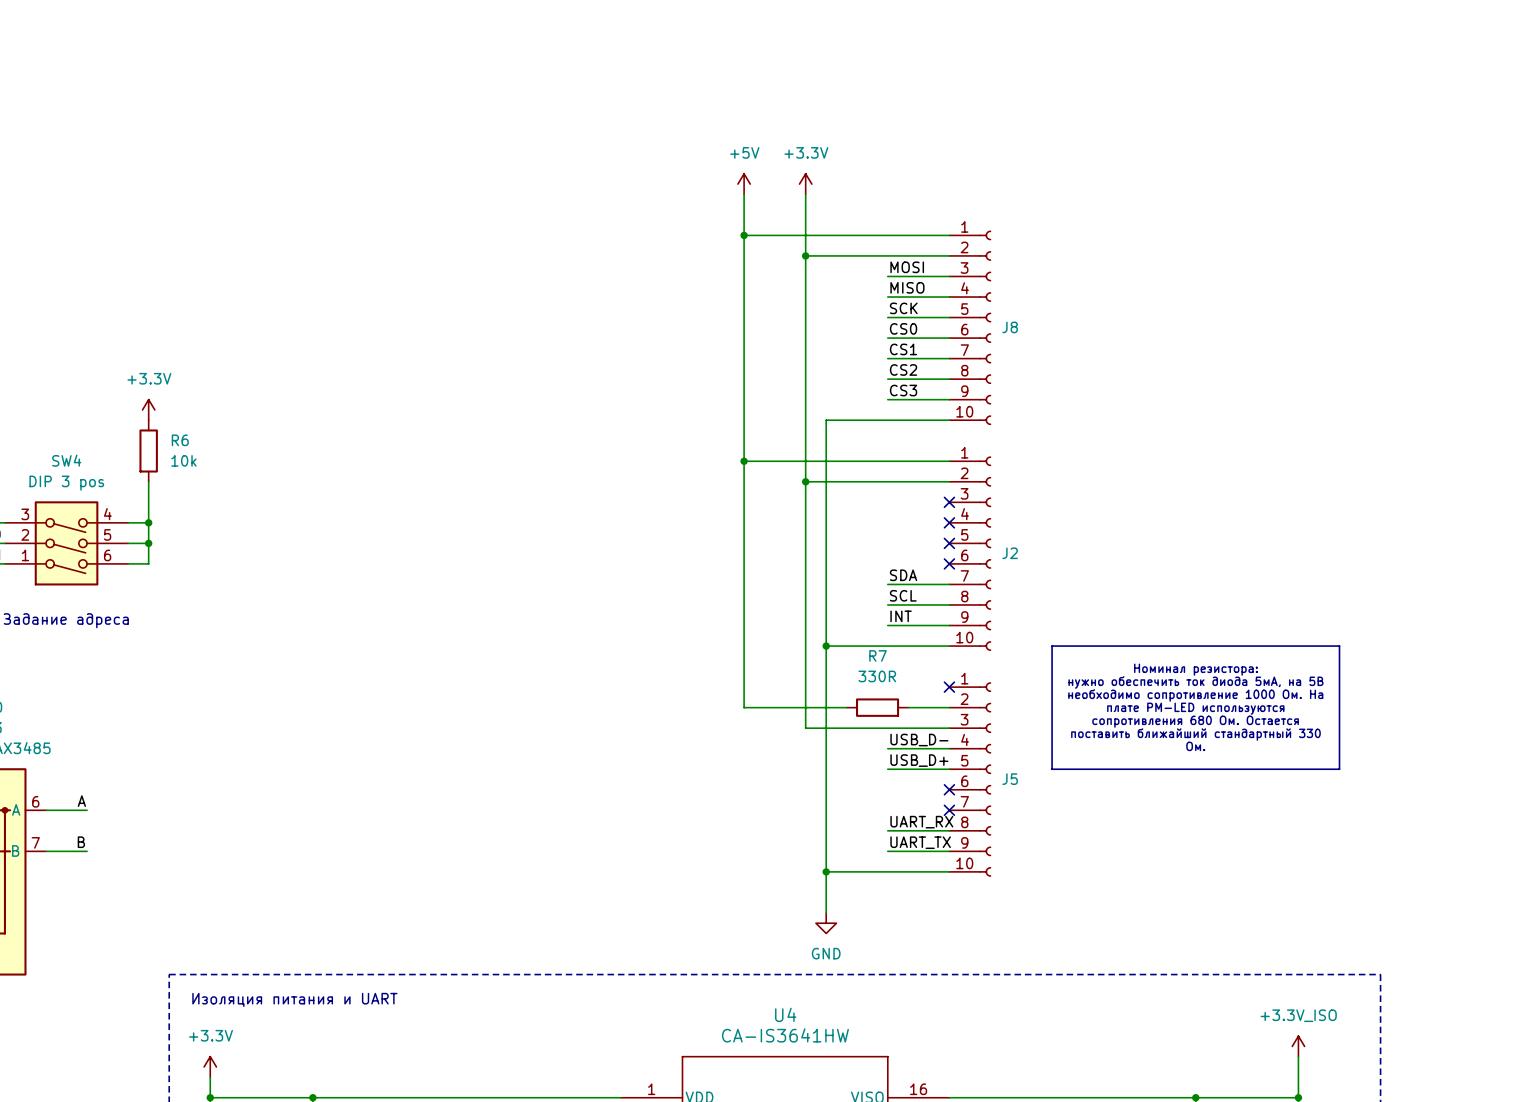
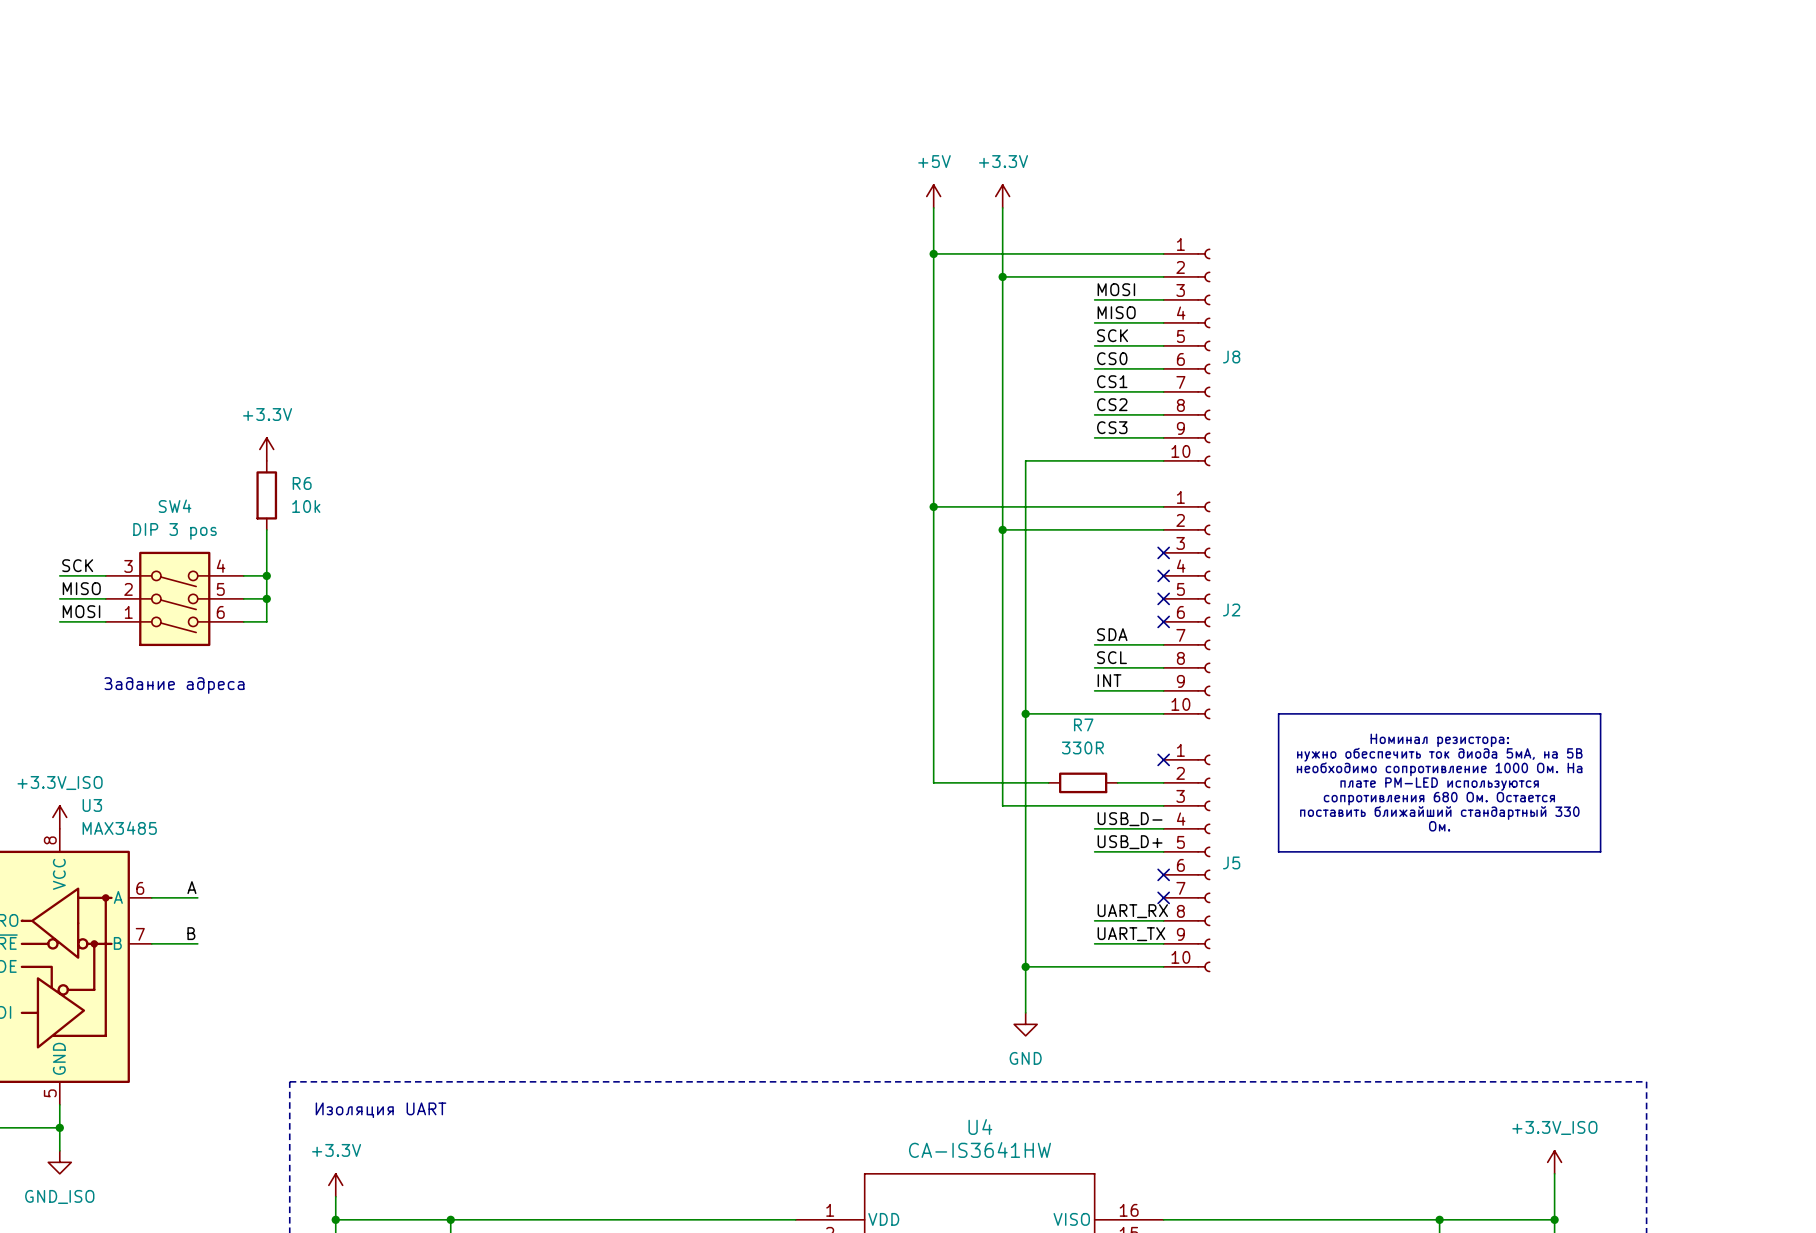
text: Изоляция питания и UART (294, 999) -> Изоляция UART (381, 1110)

